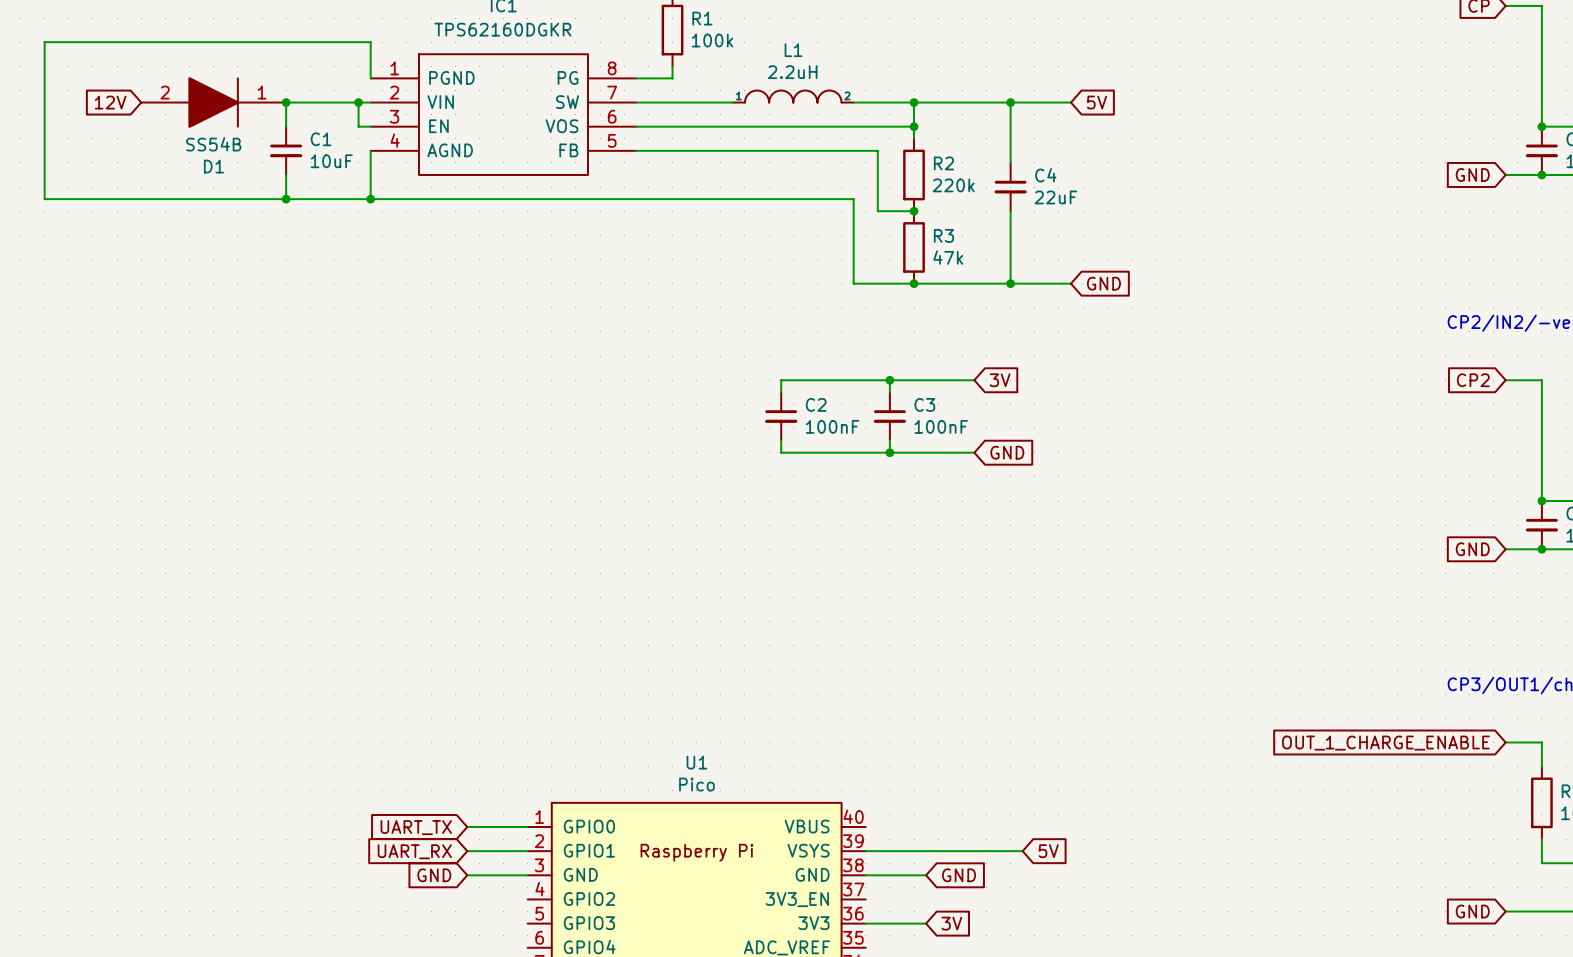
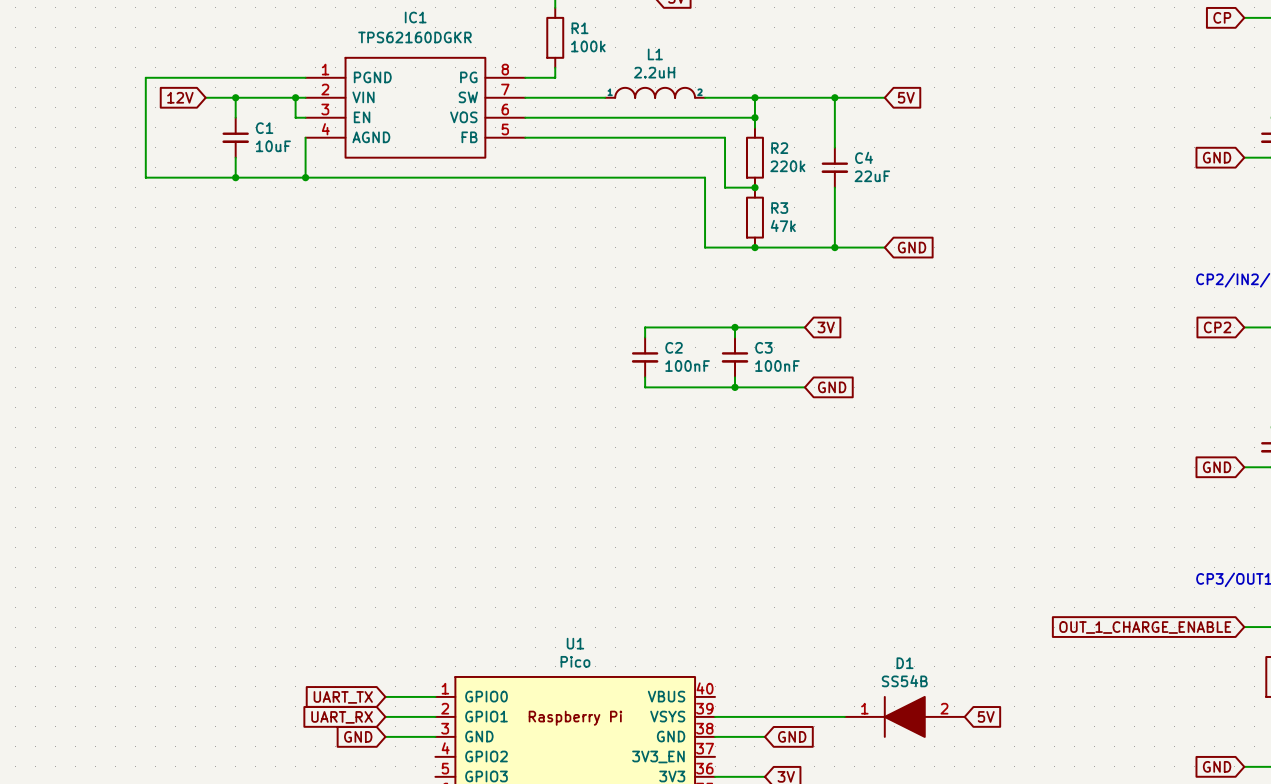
wire: (370, 78) (370, 42) (44, 42) (44, 199) (177, 199) -> (305, 77) (145, 77) (145, 177)
global label position: 12V (110, 102) -> 12V (180, 97)
D1 rotation: 0° (213, 102) -> 180° (904, 716)
D1 position: (213, 102) -> (904, 716)
global label position: 5V (1048, 851) -> 5V (986, 716)

